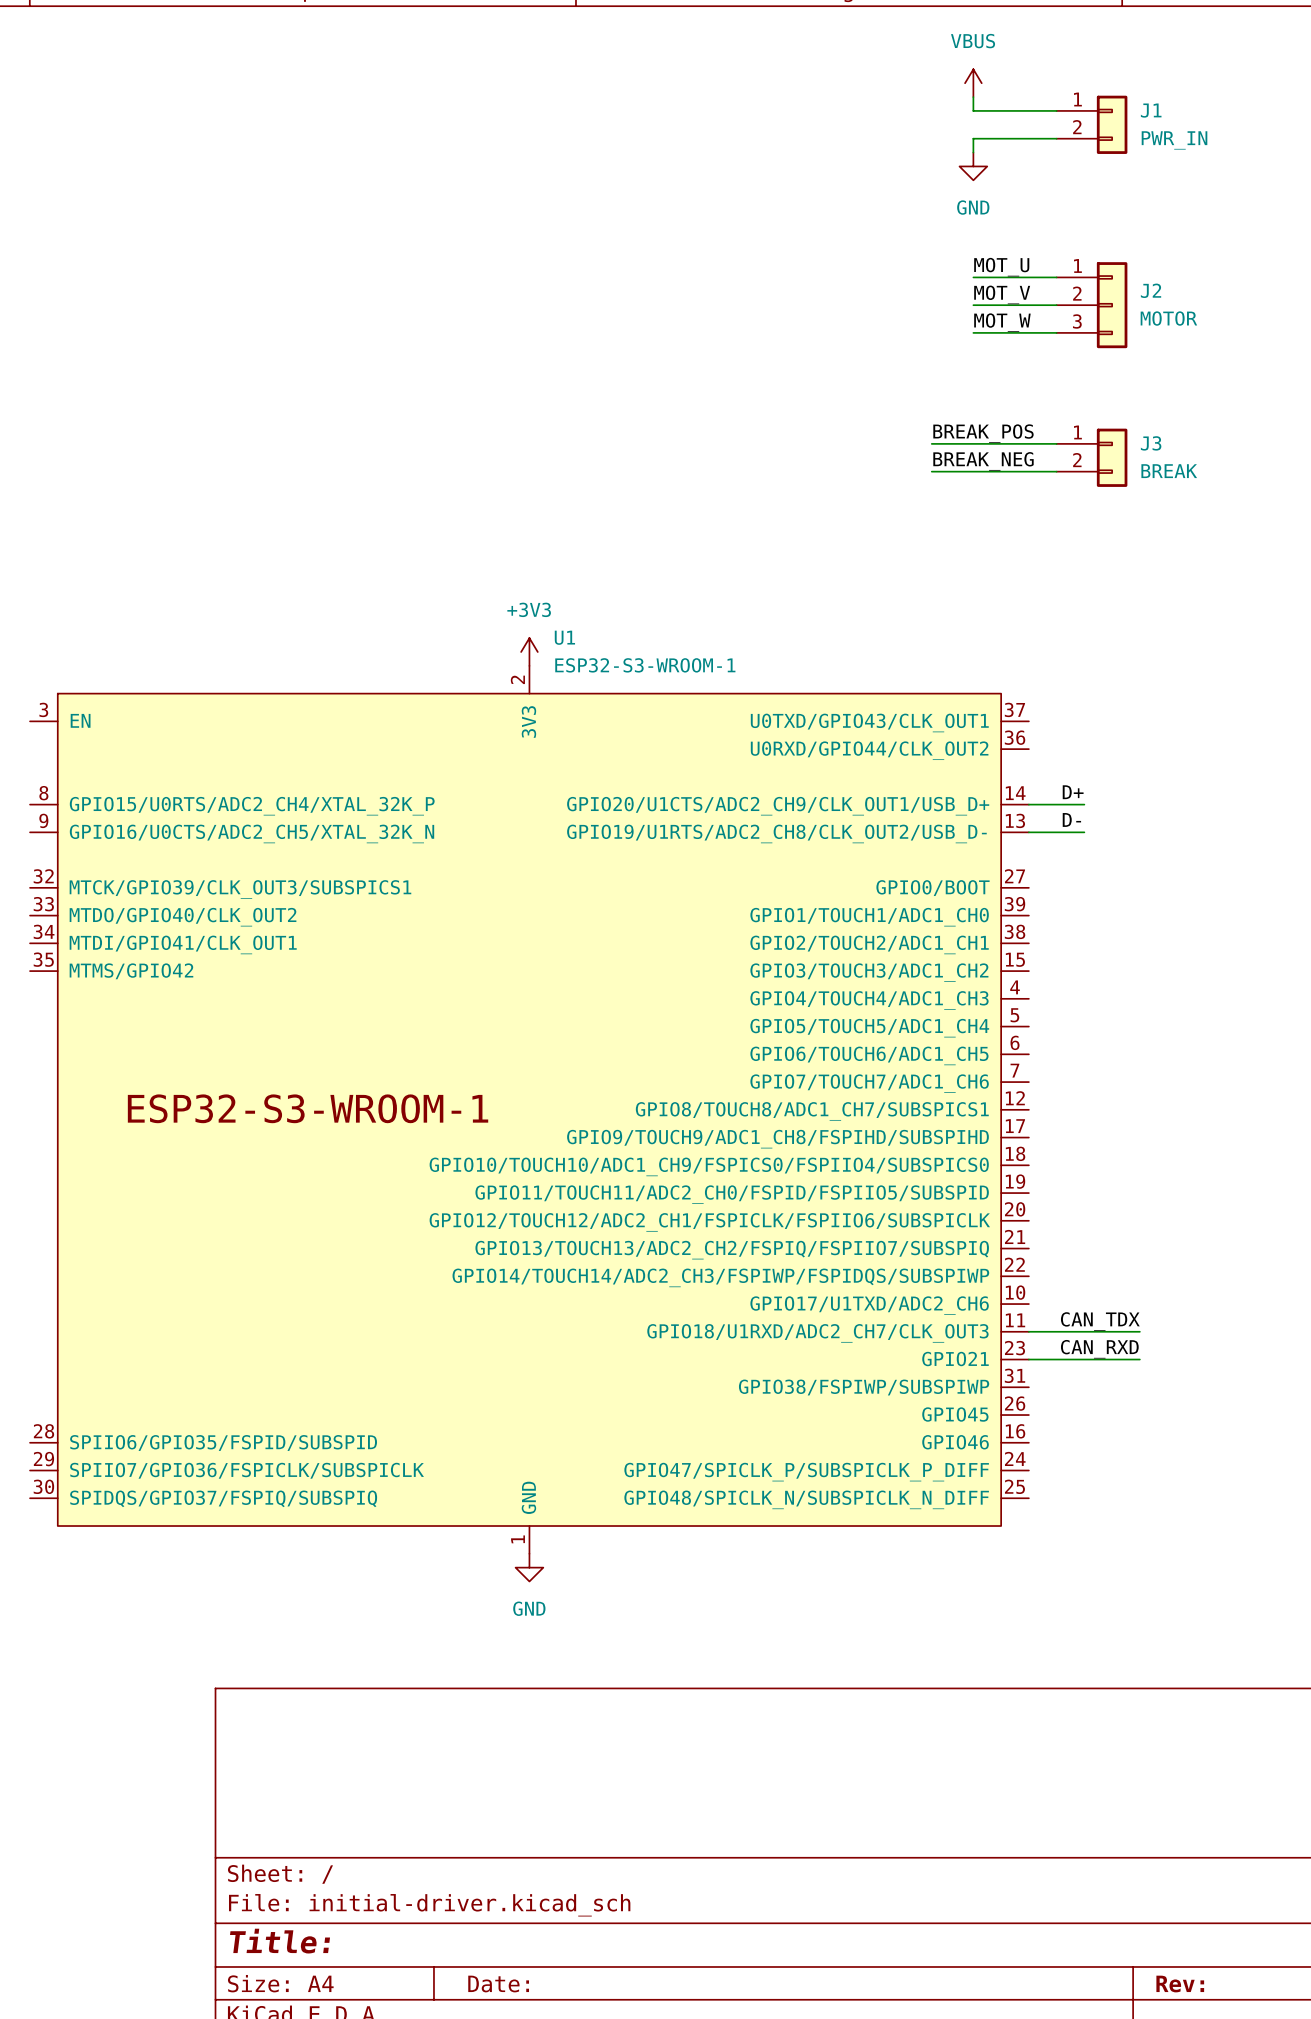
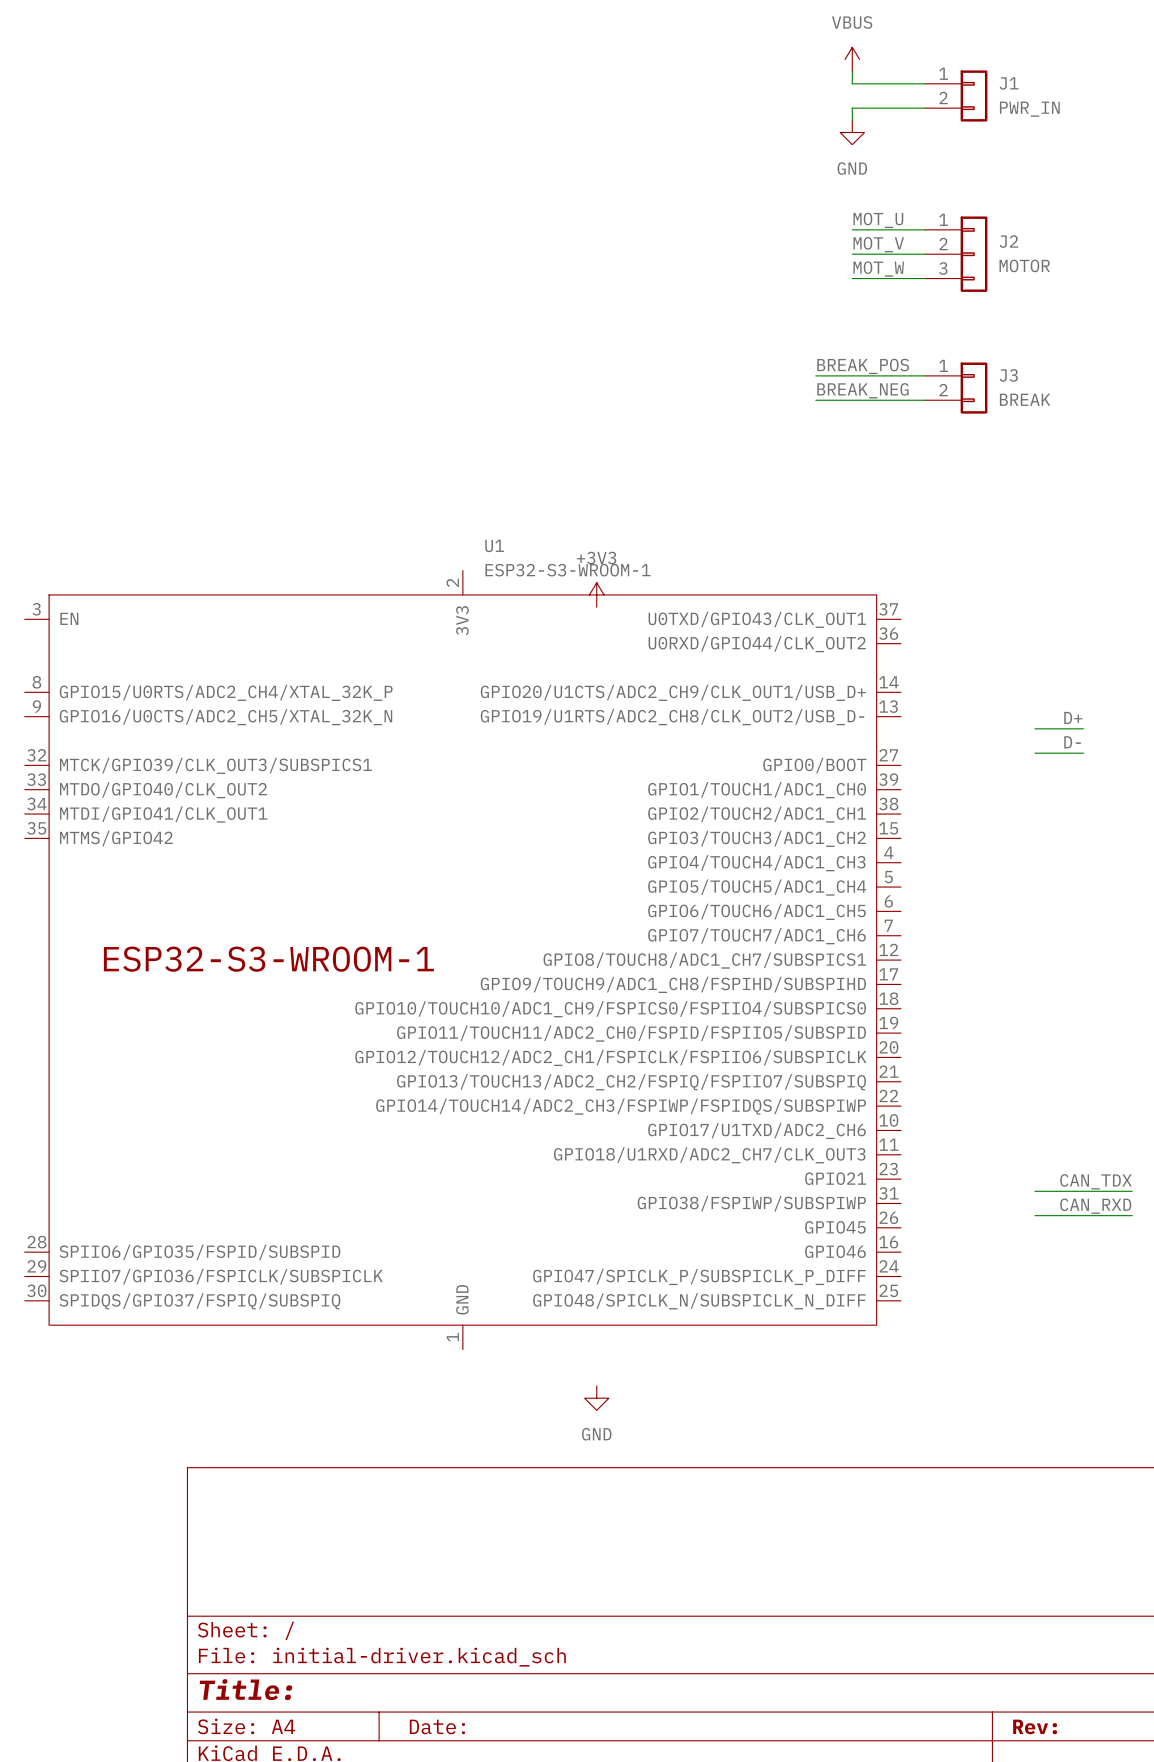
power symbol position: +3V3 (529, 652) -> +3V3 (596, 594)
label position: D+ (1073, 792) -> D+ (1073, 717)
wire: (1028, 804) (1084, 804) -> (1034, 728) (1083, 728)
label position: D- (1071, 819) -> D- (1072, 742)
wire: (1028, 832) (1084, 832) -> (1034, 753) (1083, 753)
label position: CAN_TDX (1100, 1321) -> CAN_TDX (1096, 1181)
wire: (1028, 1331) (1139, 1331) -> (1034, 1191) (1132, 1191)
label position: CAN_RXD (1099, 1349) -> CAN_RXD (1095, 1206)
wire: (1028, 1359) (1139, 1359) -> (1034, 1215) (1132, 1215)
power symbol position: GND (529, 1567) -> GND (596, 1398)

